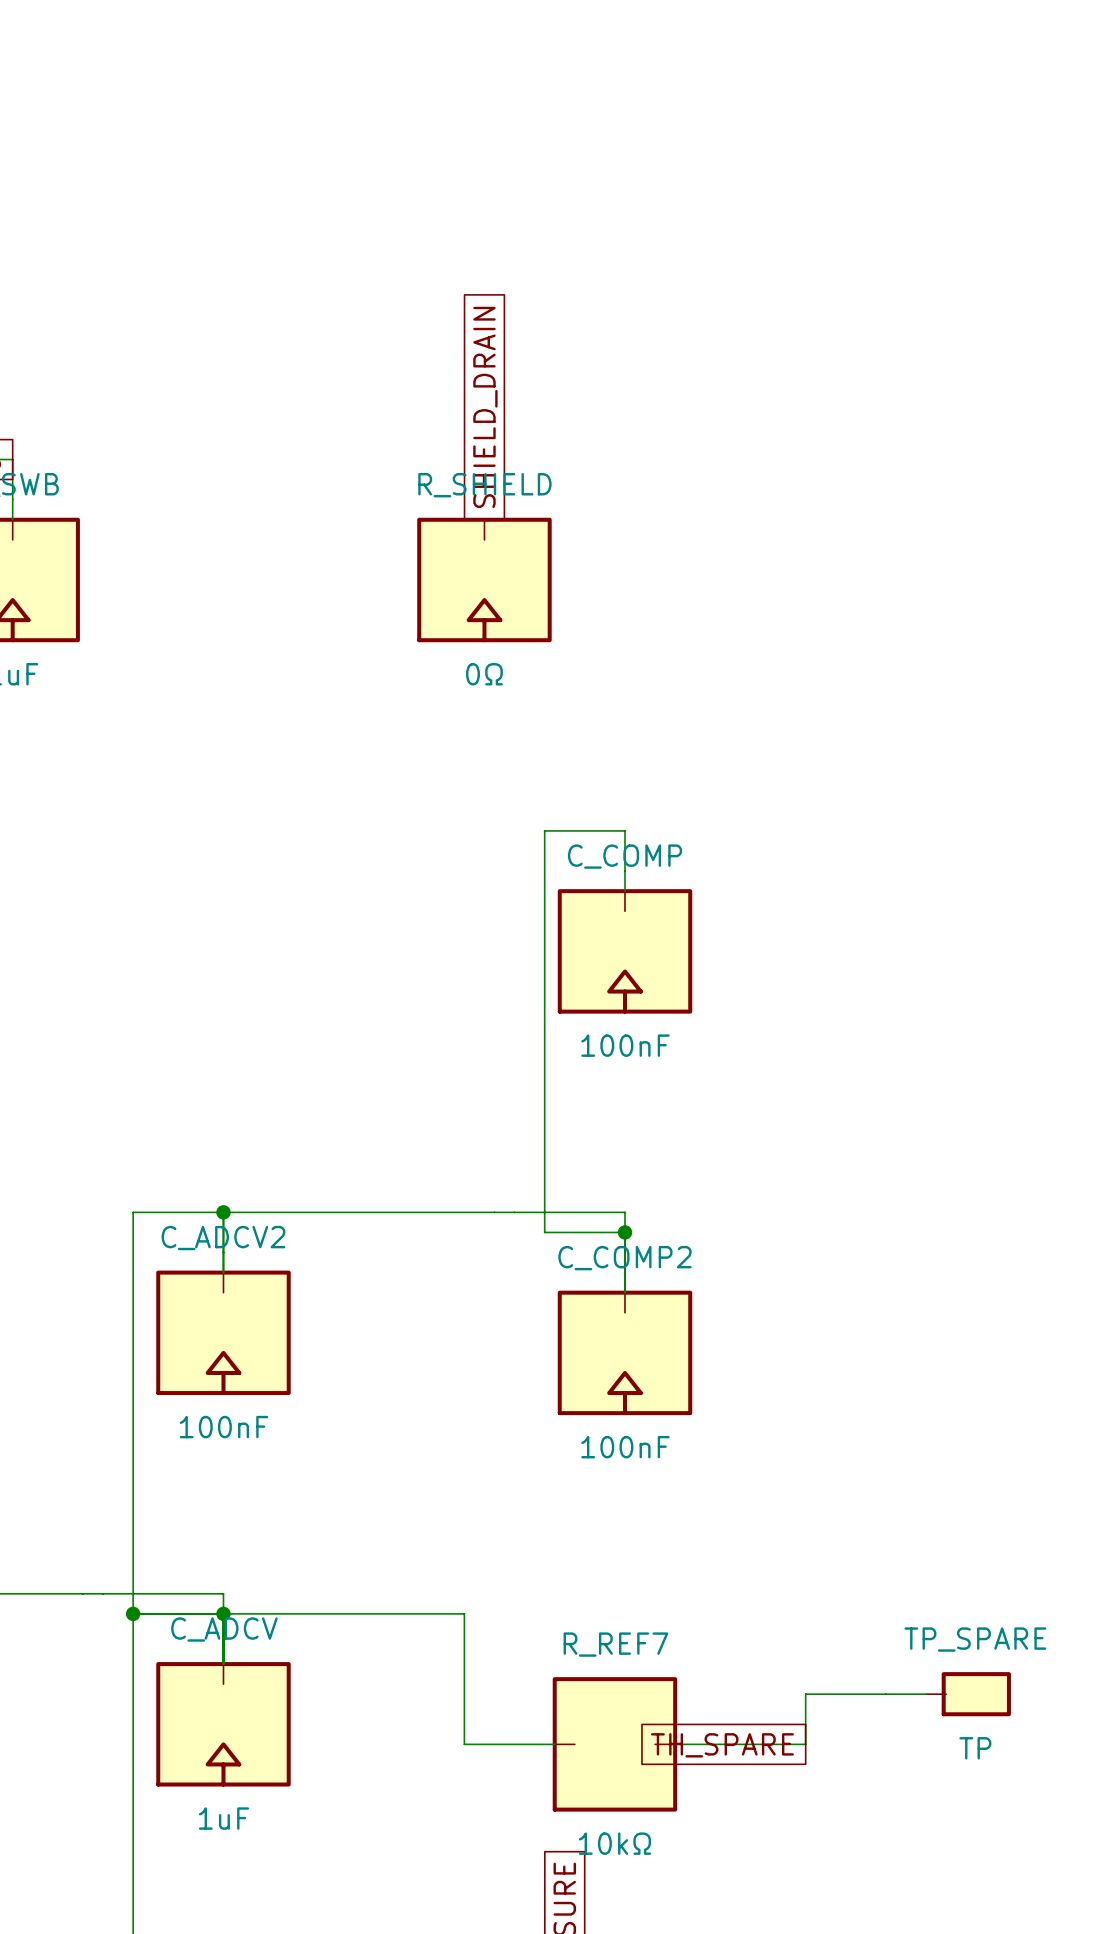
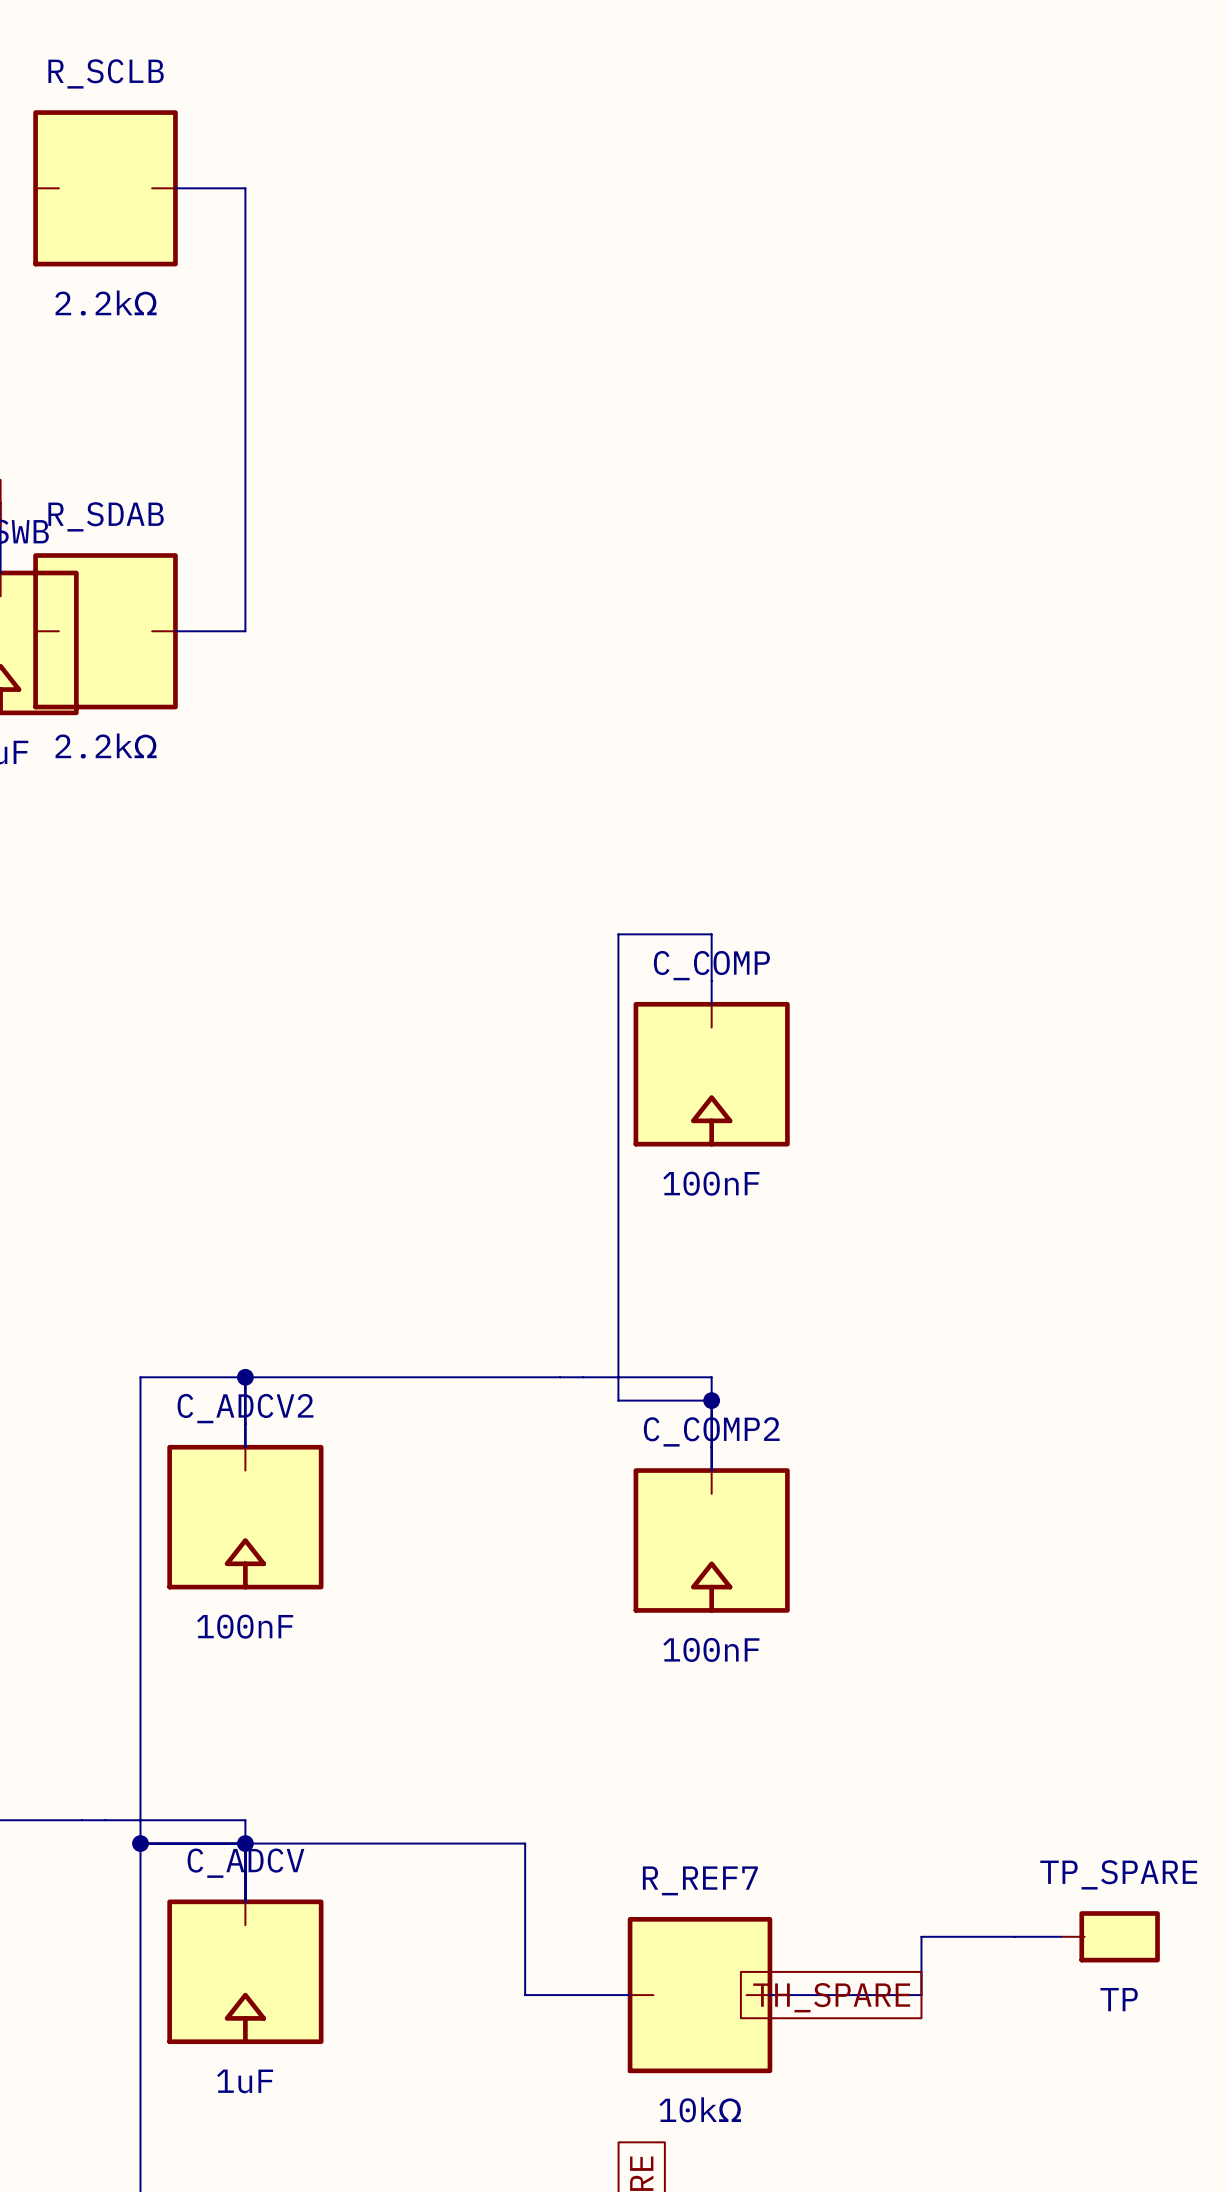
R_SCLB: none -> 2.2kΩ (105, 188)
wire: none -> (175, 188) (245, 188) (245, 631) (175, 631)
global label: SHIELD_DRAIN (485, 407) -> none
R_SDAB: none -> 2.2kΩ (105, 631)
R_SHIELD: 0Ω (484, 579) -> none
power symbol: (484, 620) -> none

